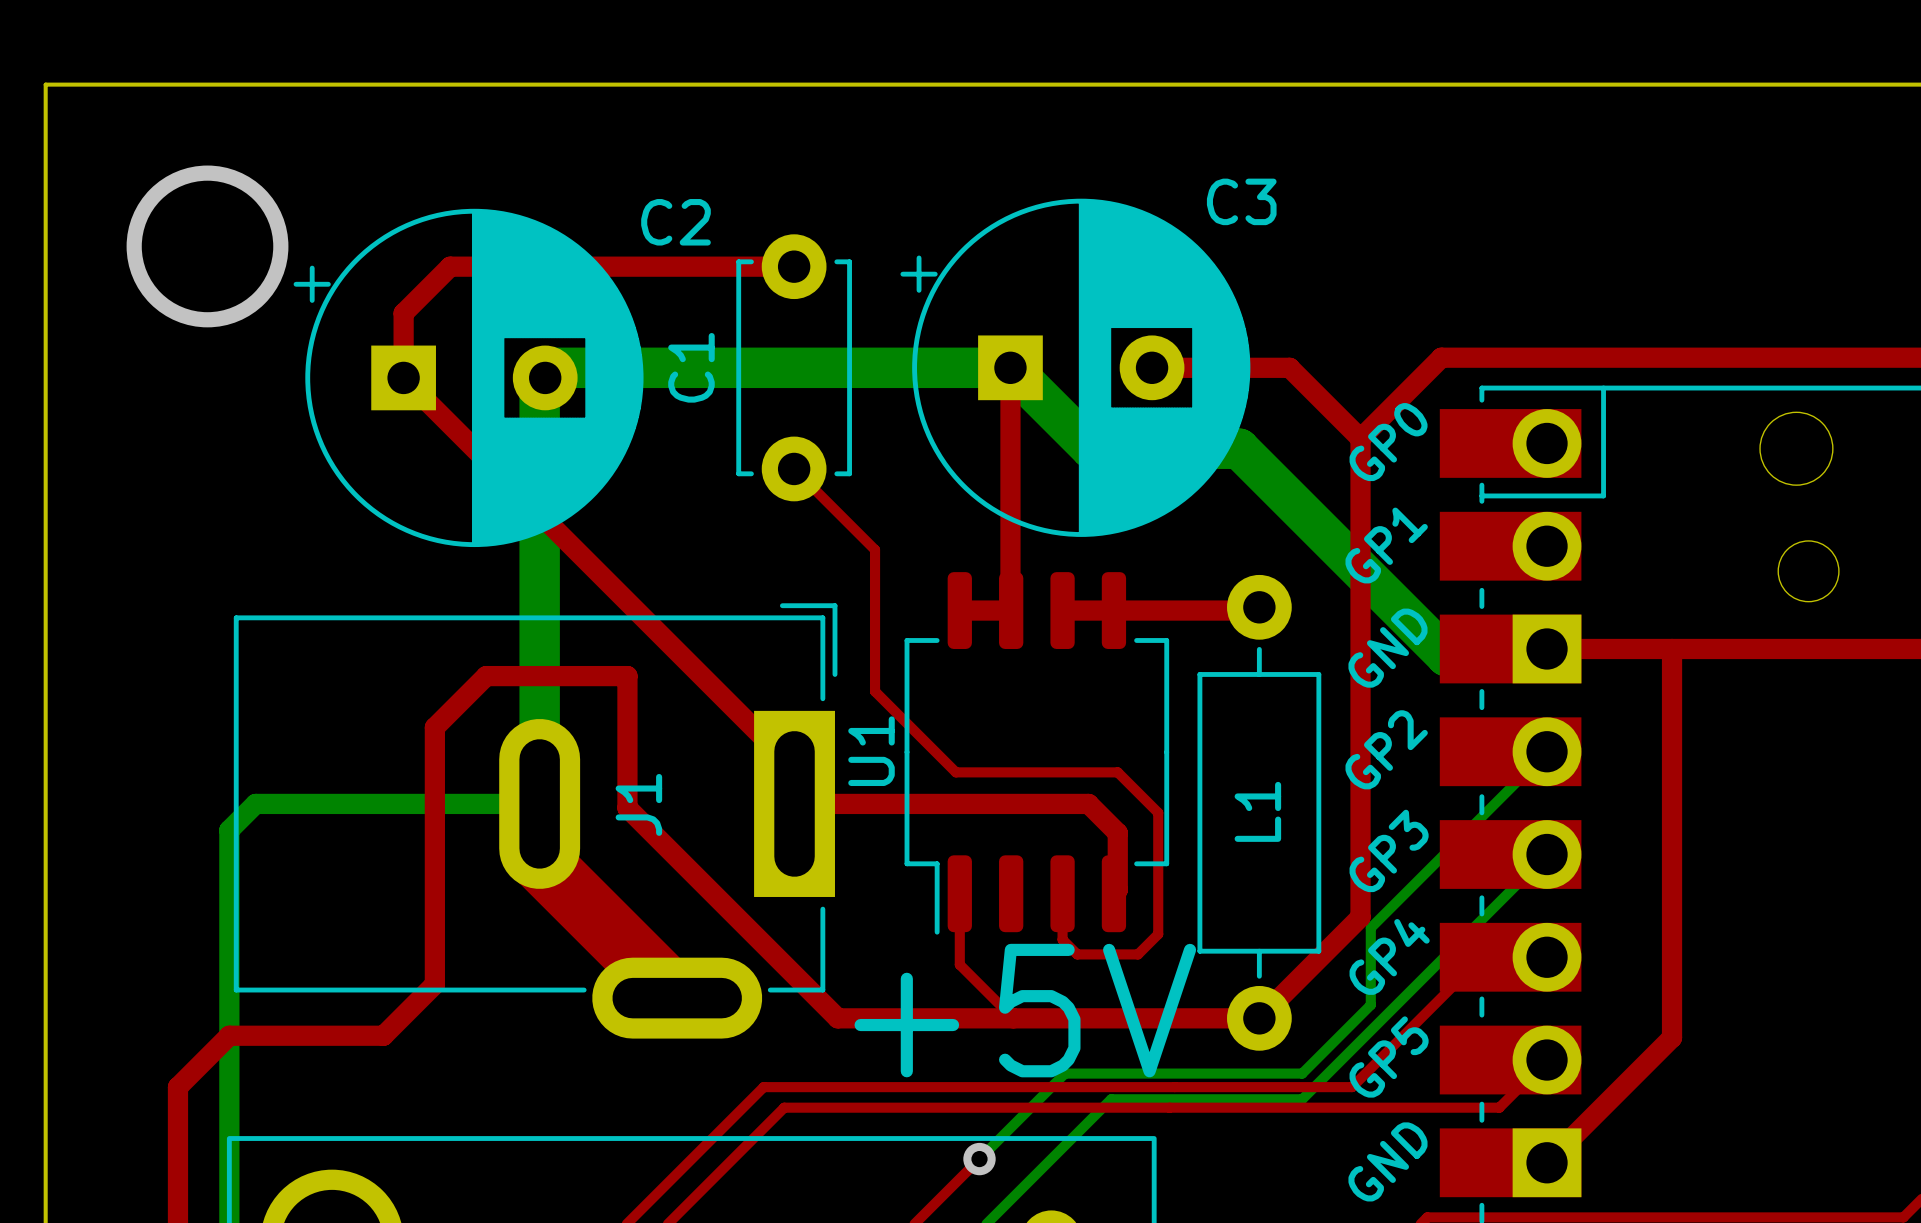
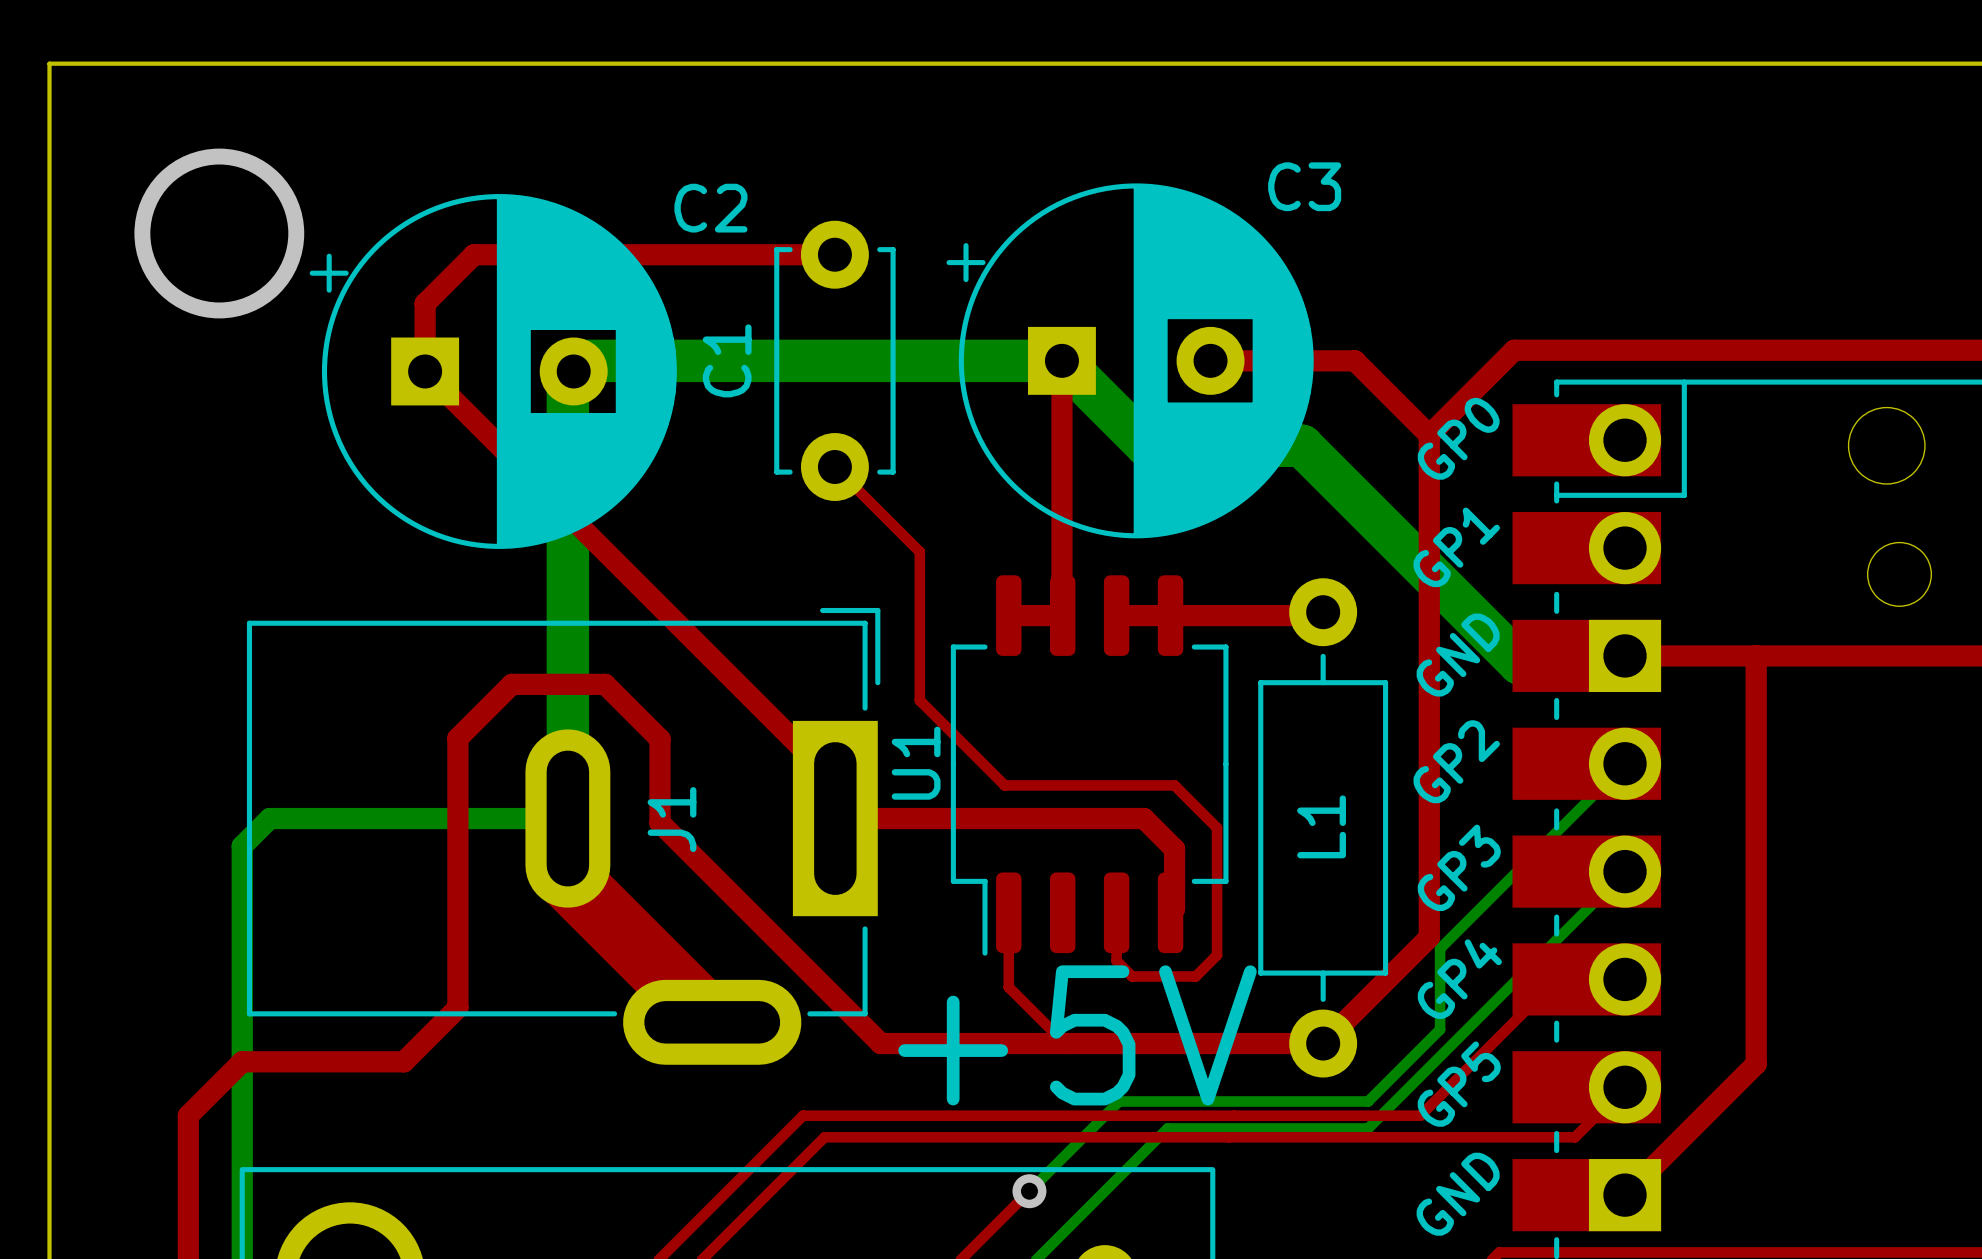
top track: (575, 676) (627, 676) (627, 728) -> (605, 684) (660, 739)

